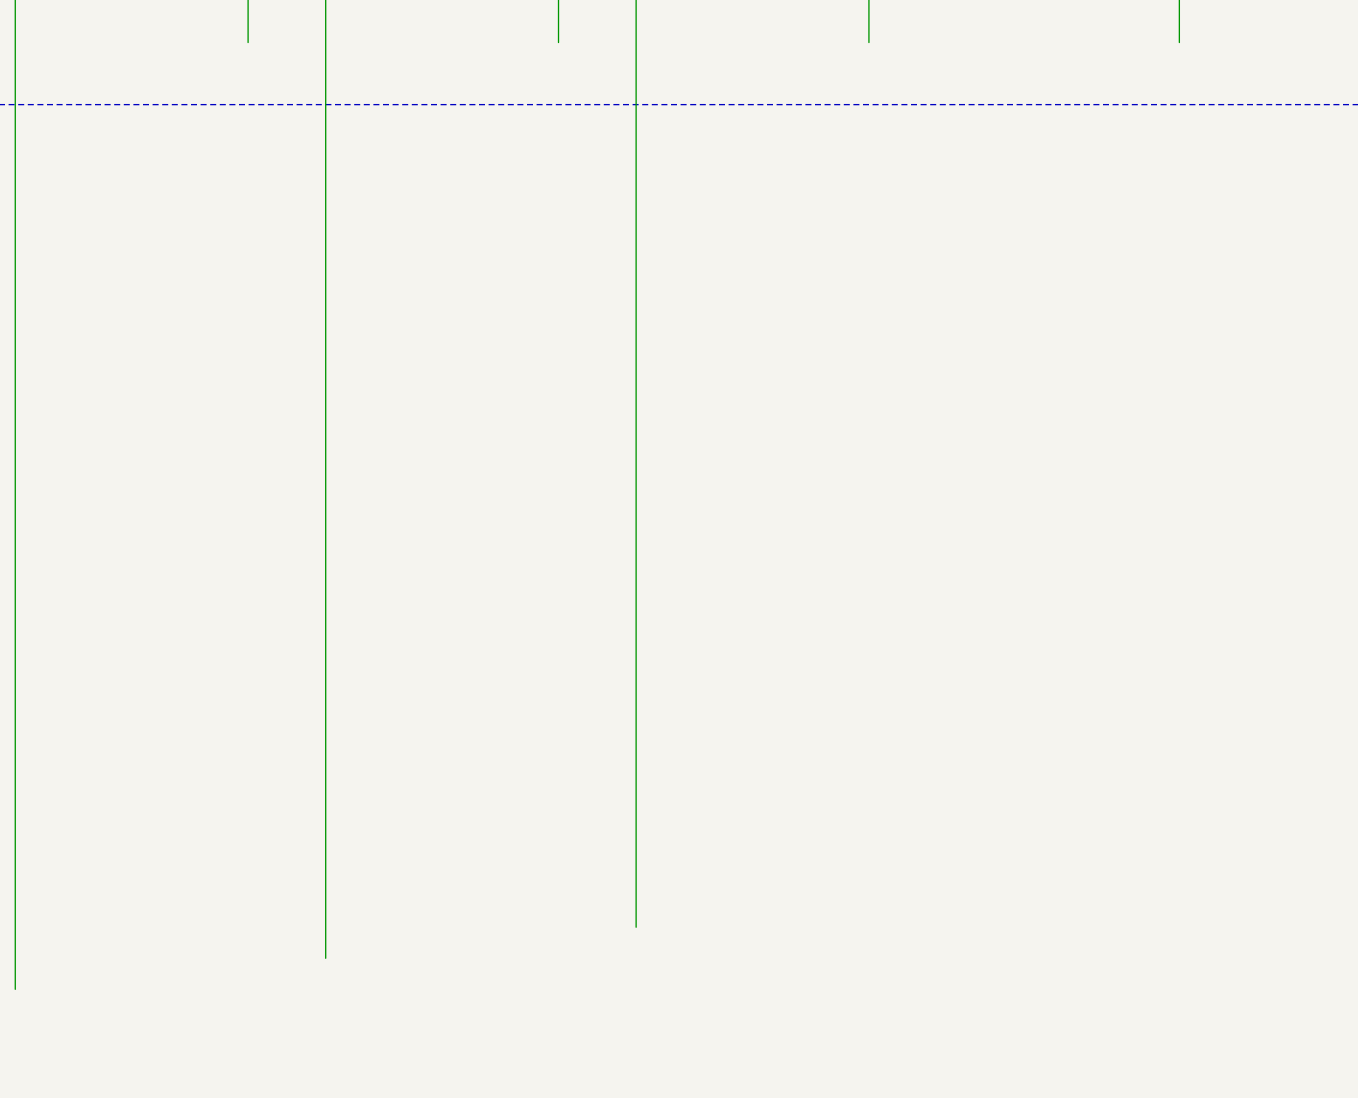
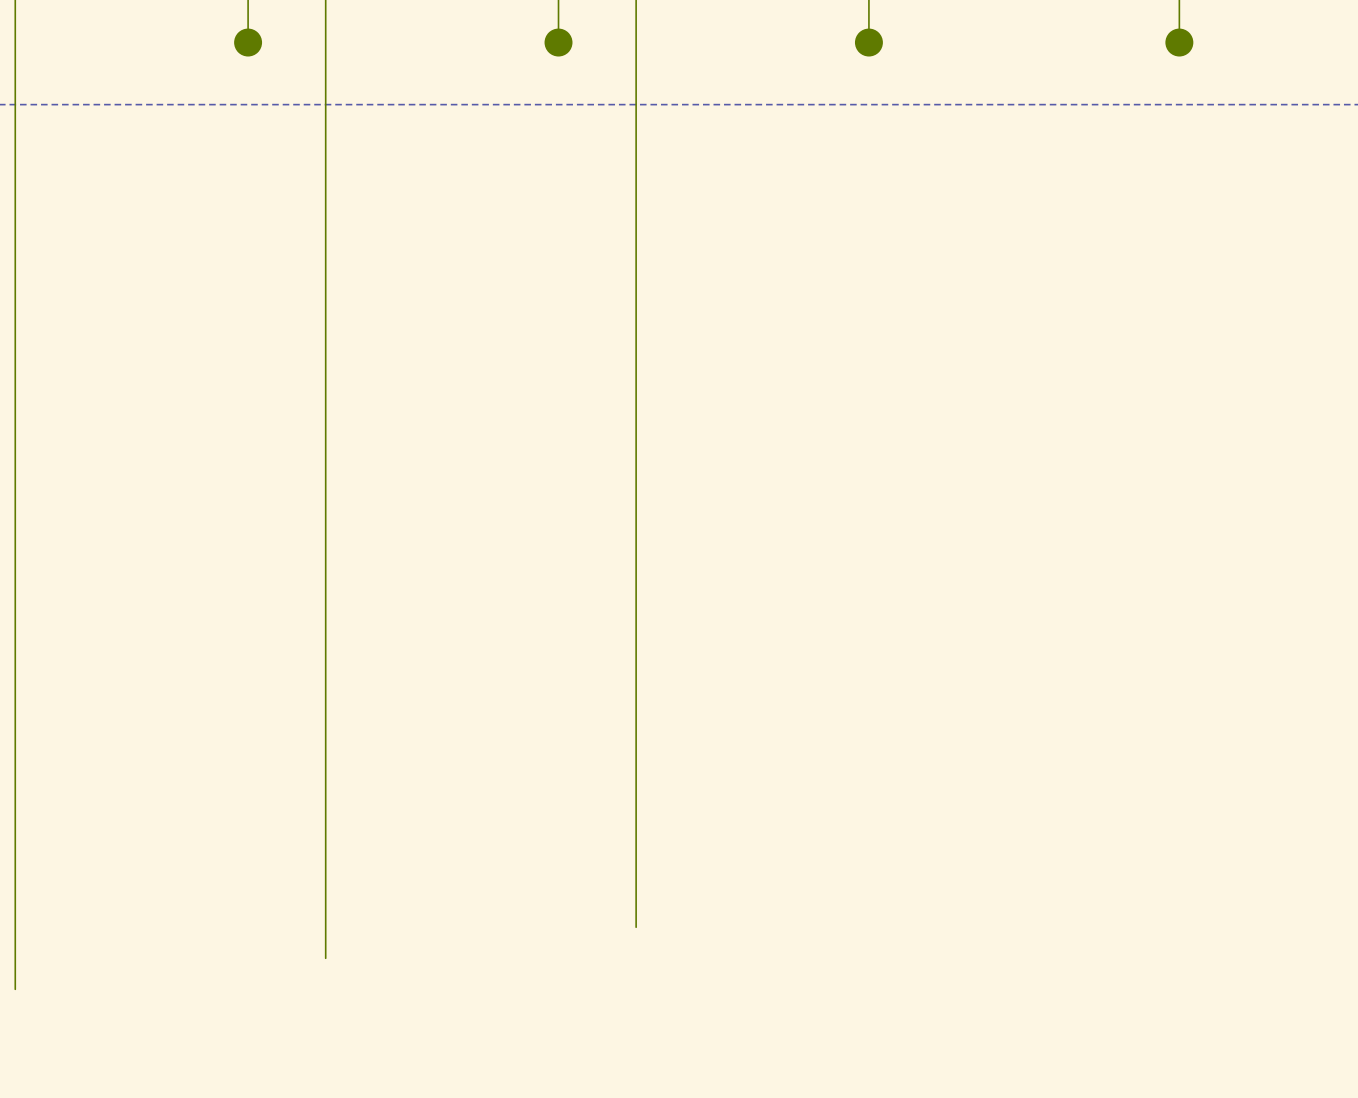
junction: none -> (248, 42)
junction: none -> (558, 42)
junction: none -> (868, 42)
junction: none -> (1179, 42)

